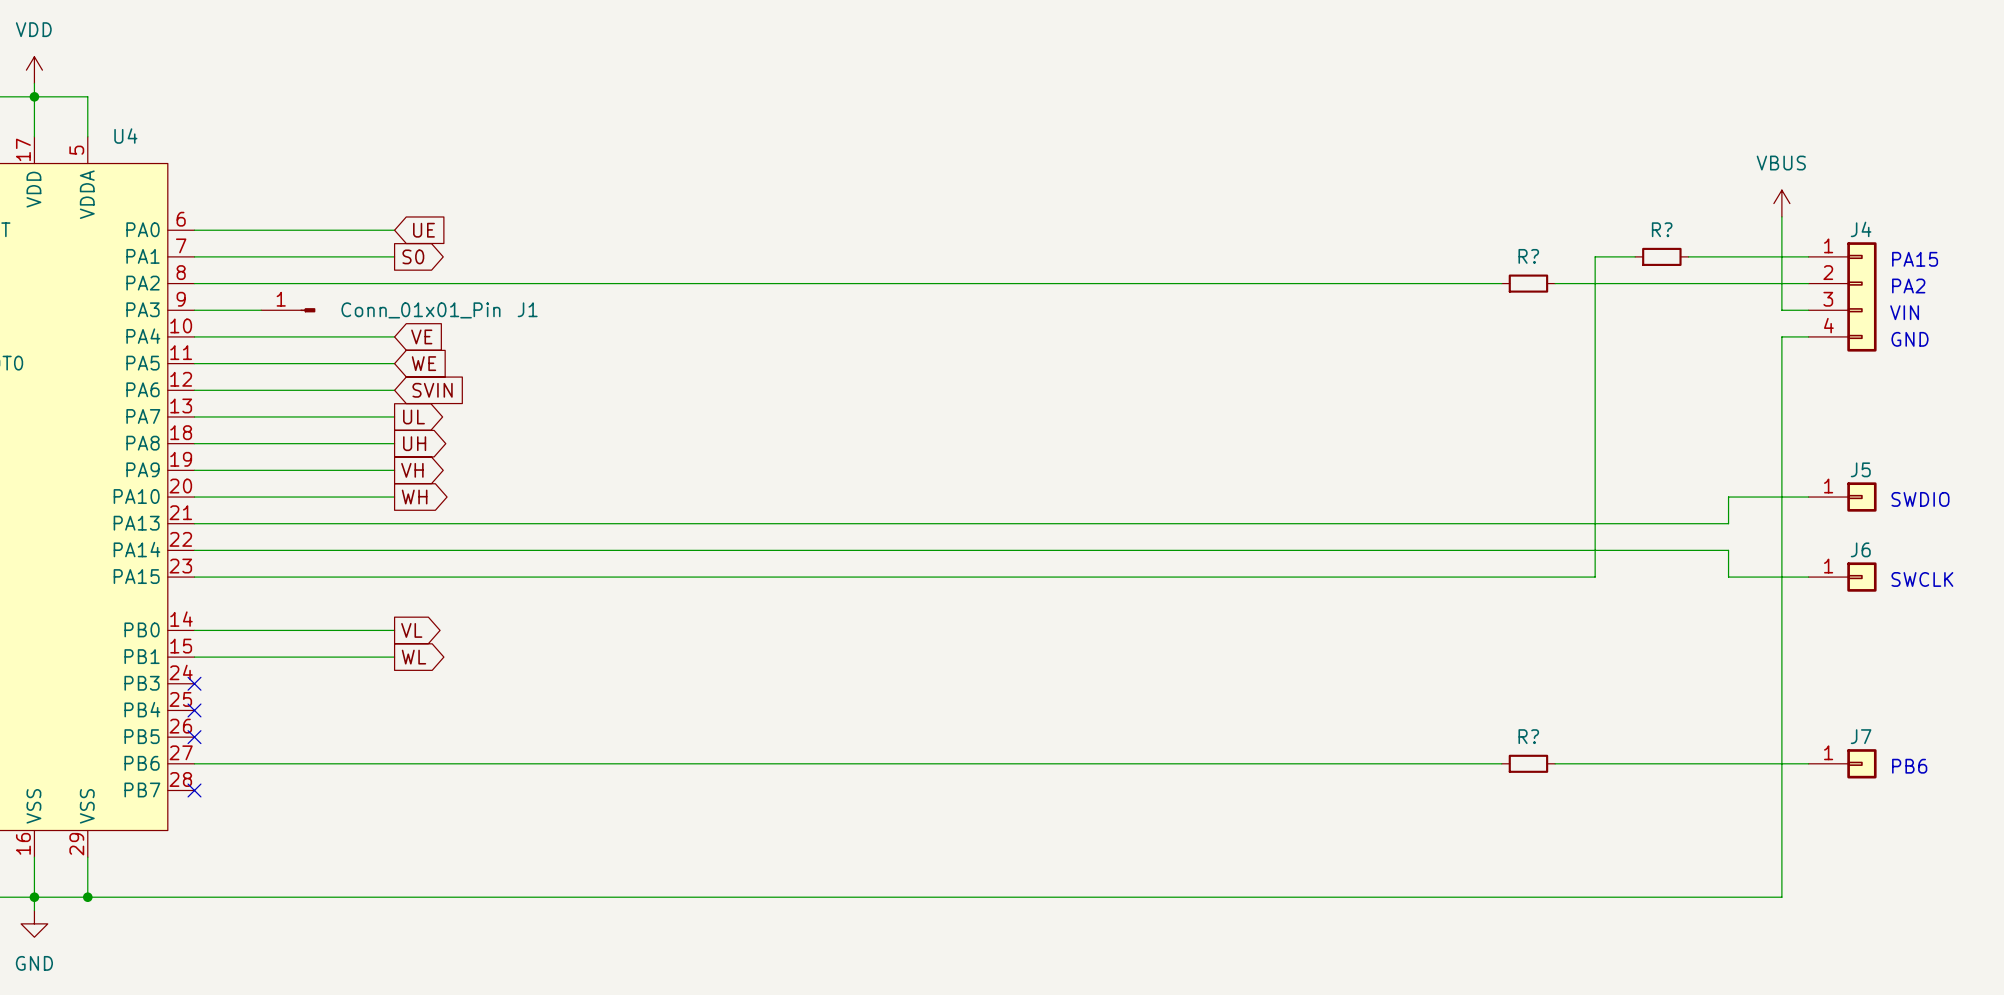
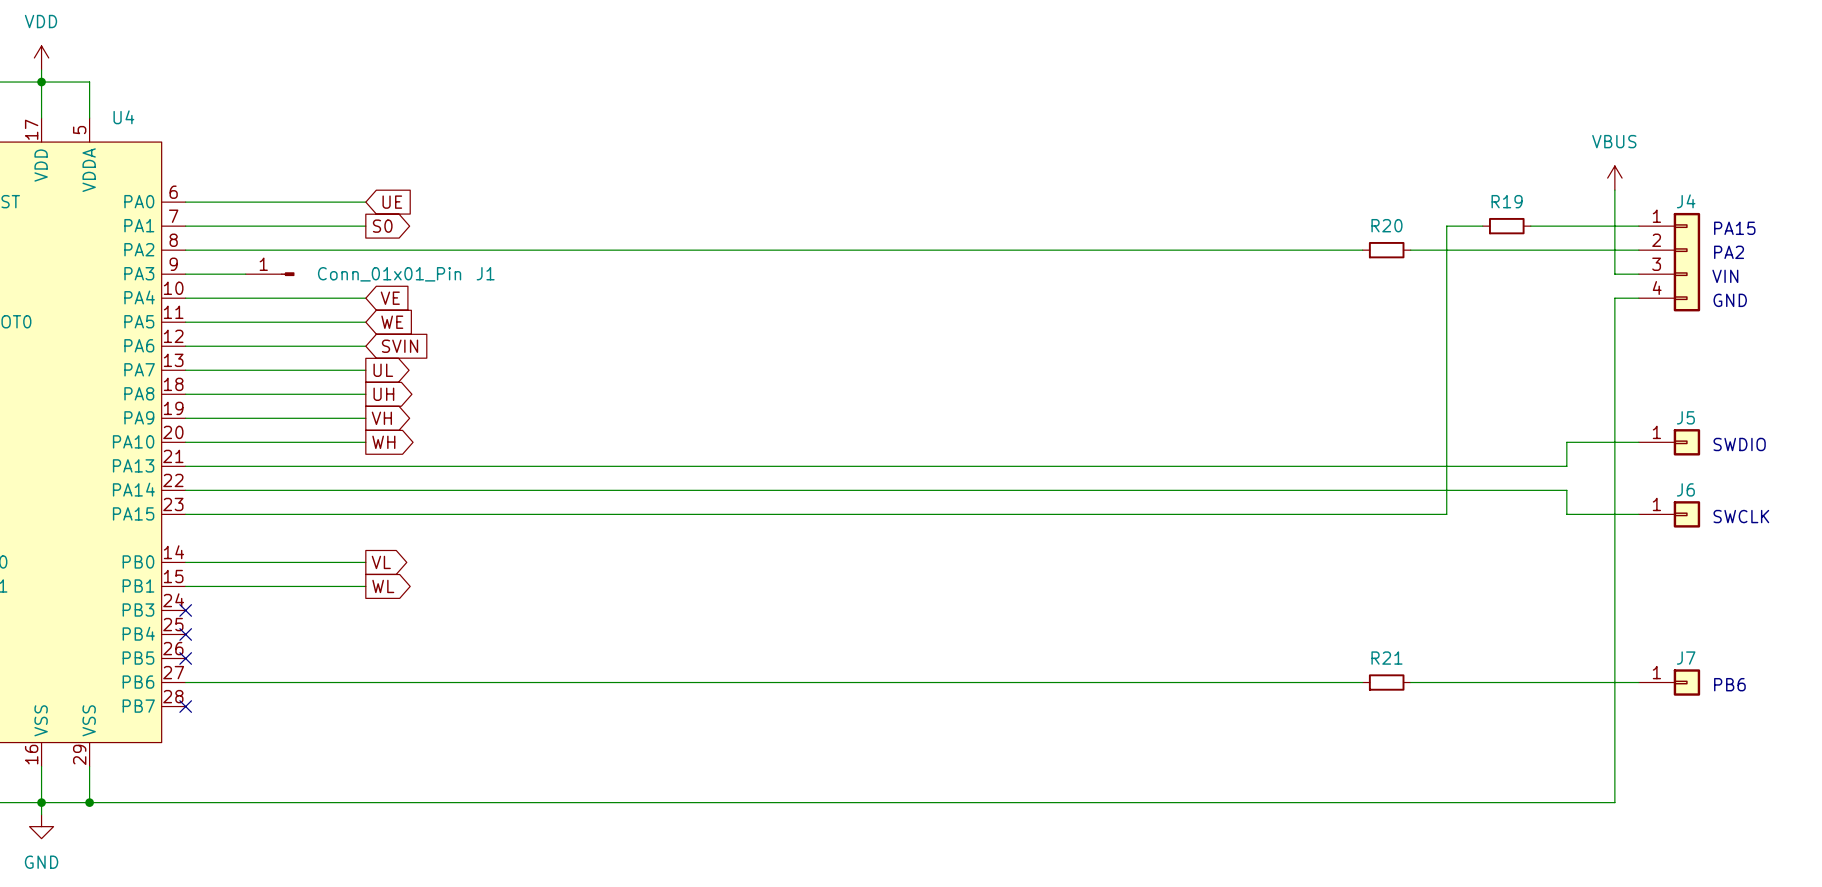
R? name: R? (1662, 229) -> R19 (1507, 201)
R? name: R? (1528, 256) -> R20 (1386, 225)
R? name: R? (1528, 736) -> R21 (1386, 658)

